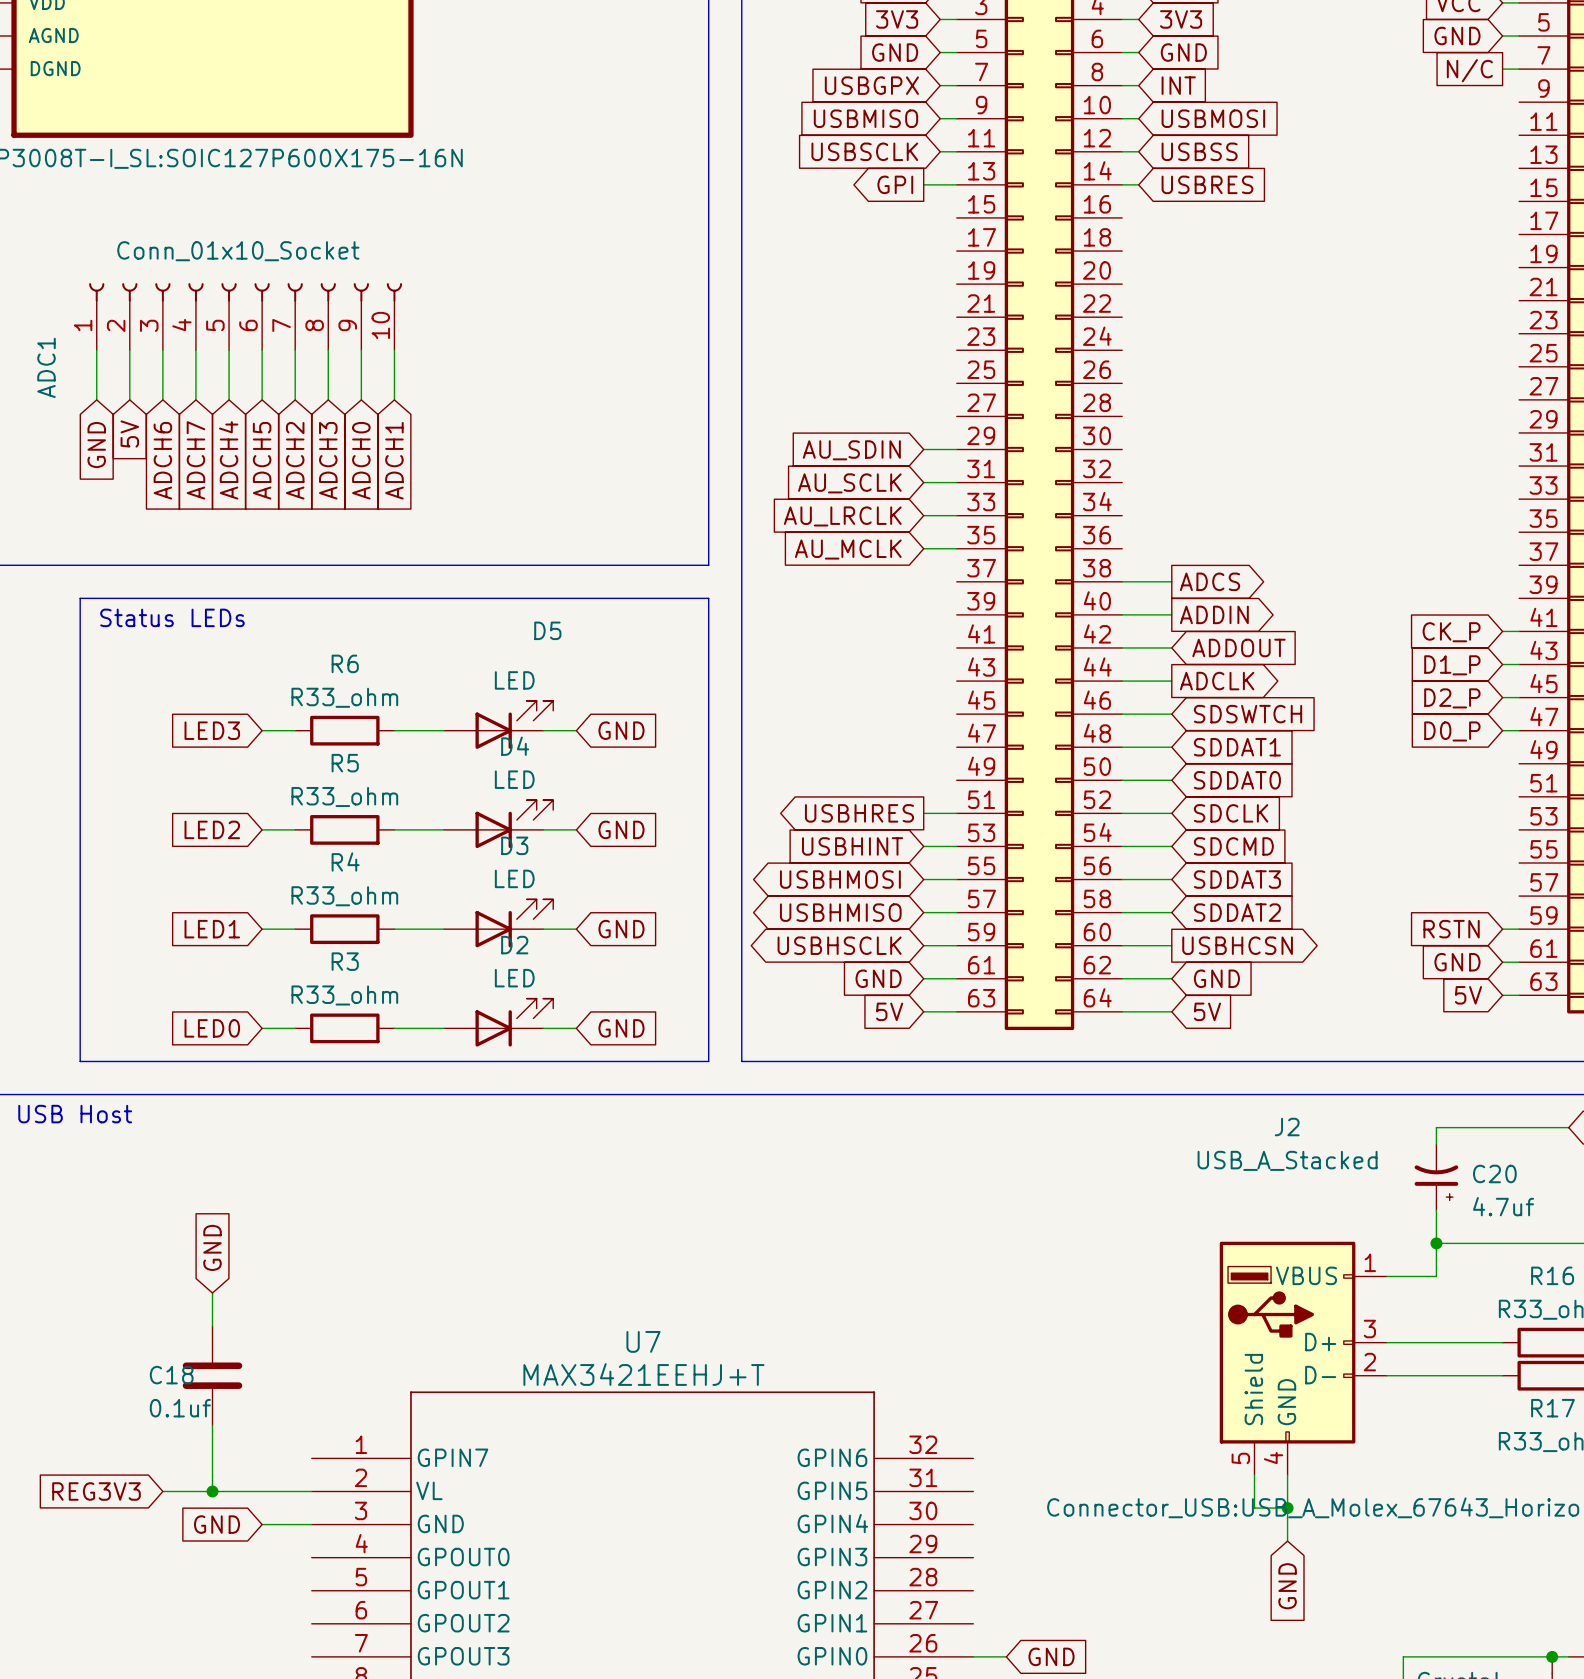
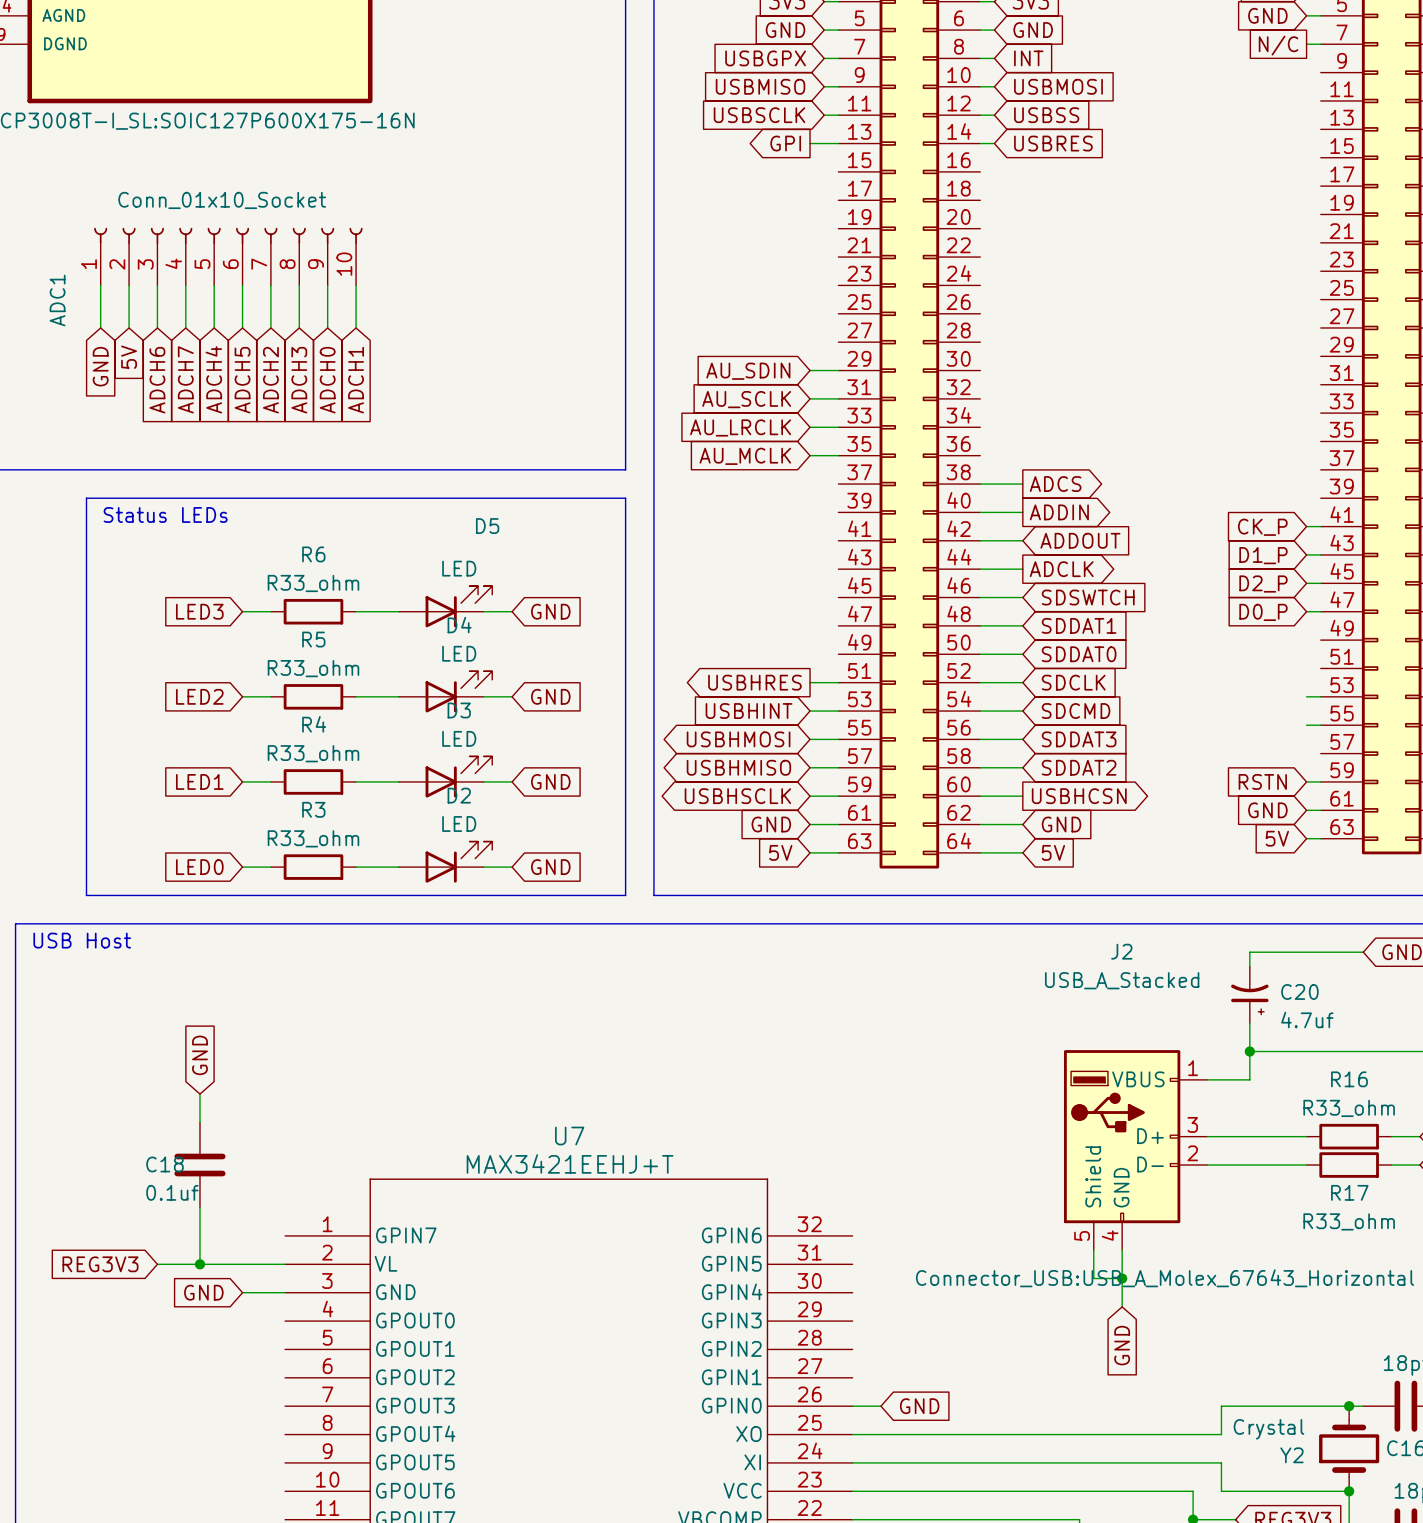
wire: none -> (1306, 696) (1320, 696)
wire: none -> (1306, 725) (1320, 725)

